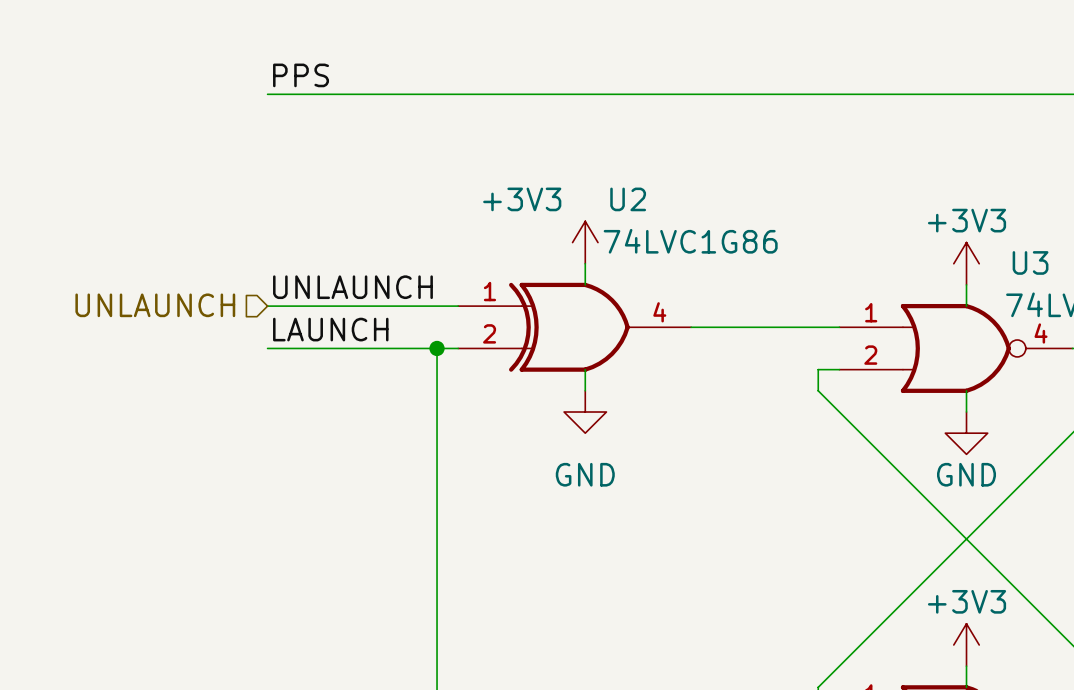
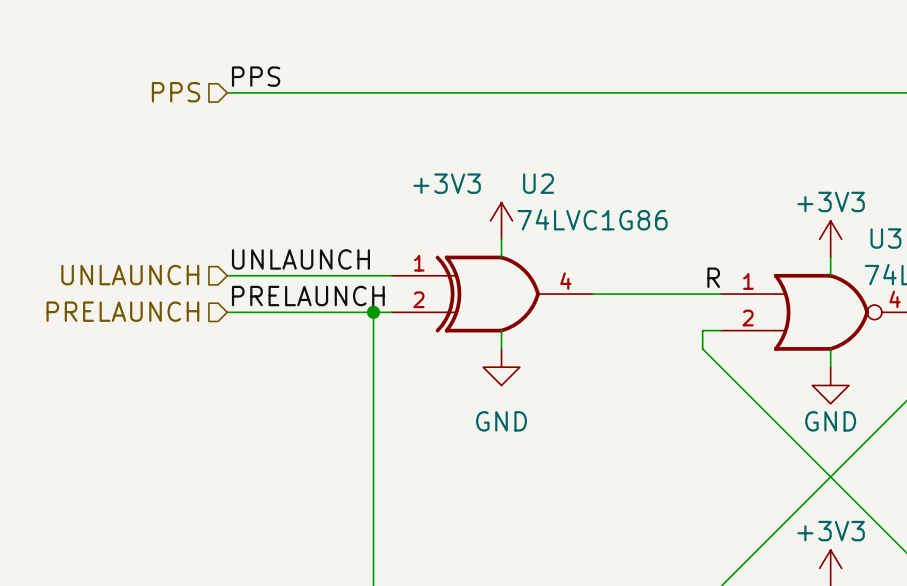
hierarchical label: none -> PPS (176, 92)
label: none -> R (713, 277)
label: LAUNCH (330, 329) -> PRELAUNCH (308, 296)
hierarchical label: none -> PRELAUNCH (122, 311)

